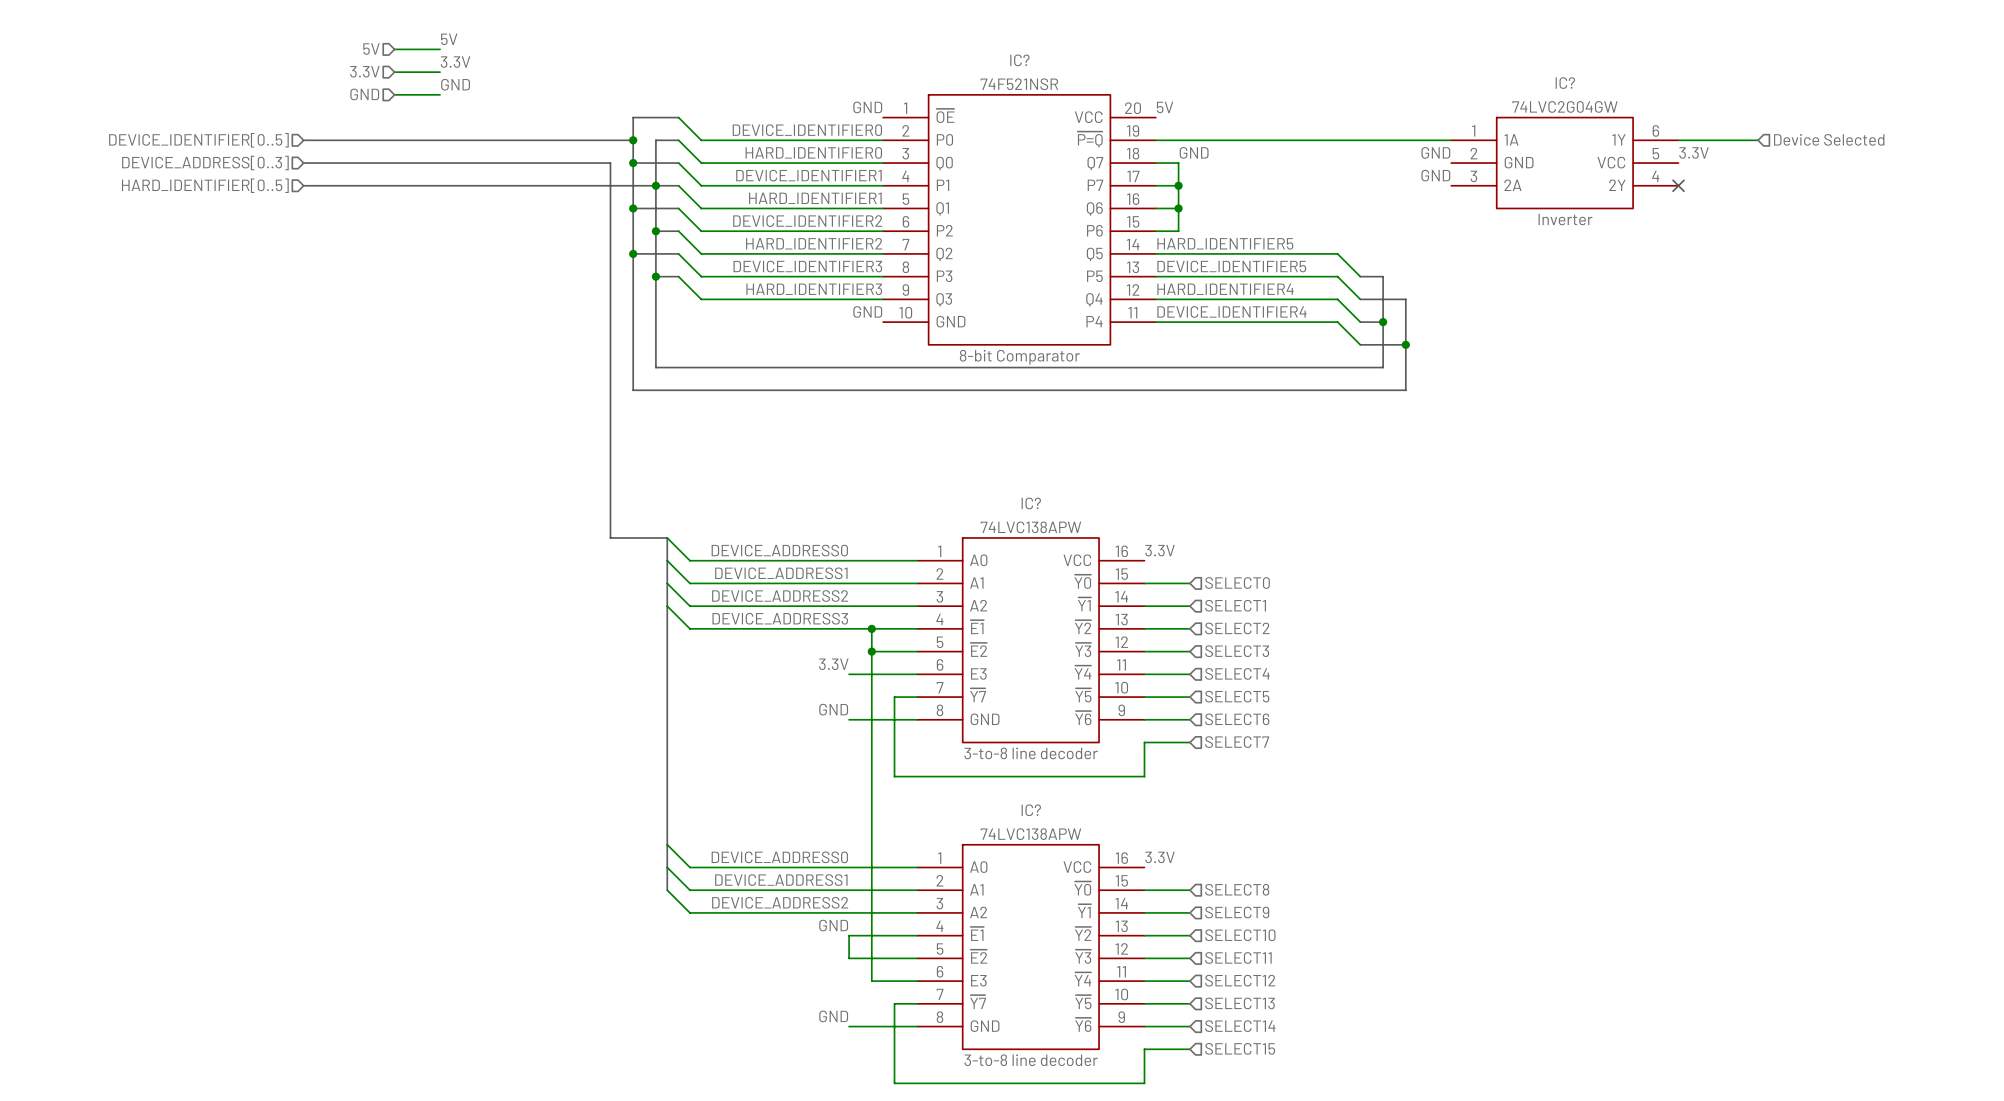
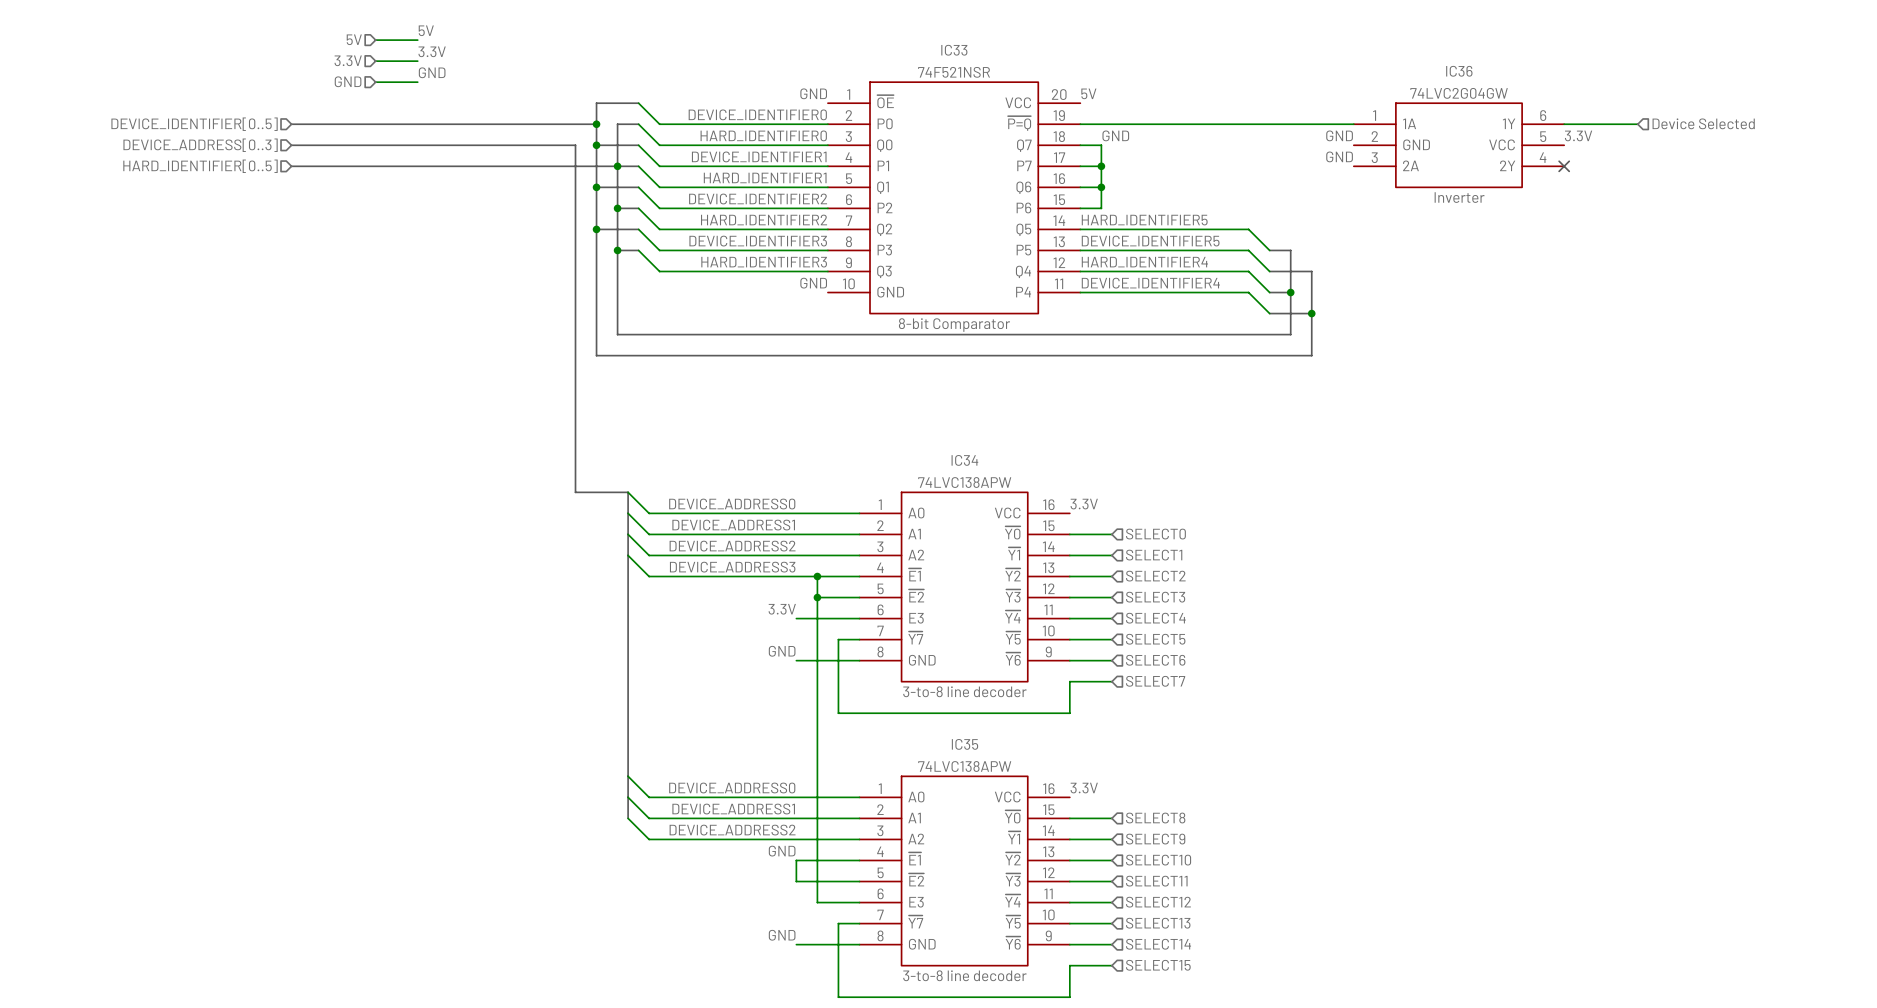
IC? name: IC? (1019, 60) -> IC33 (954, 50)
IC? name: IC? (1565, 83) -> IC36 (1459, 71)
IC? name: IC? (1031, 503) -> IC34 (964, 460)
IC? name: IC? (1031, 810) -> IC35 (964, 744)

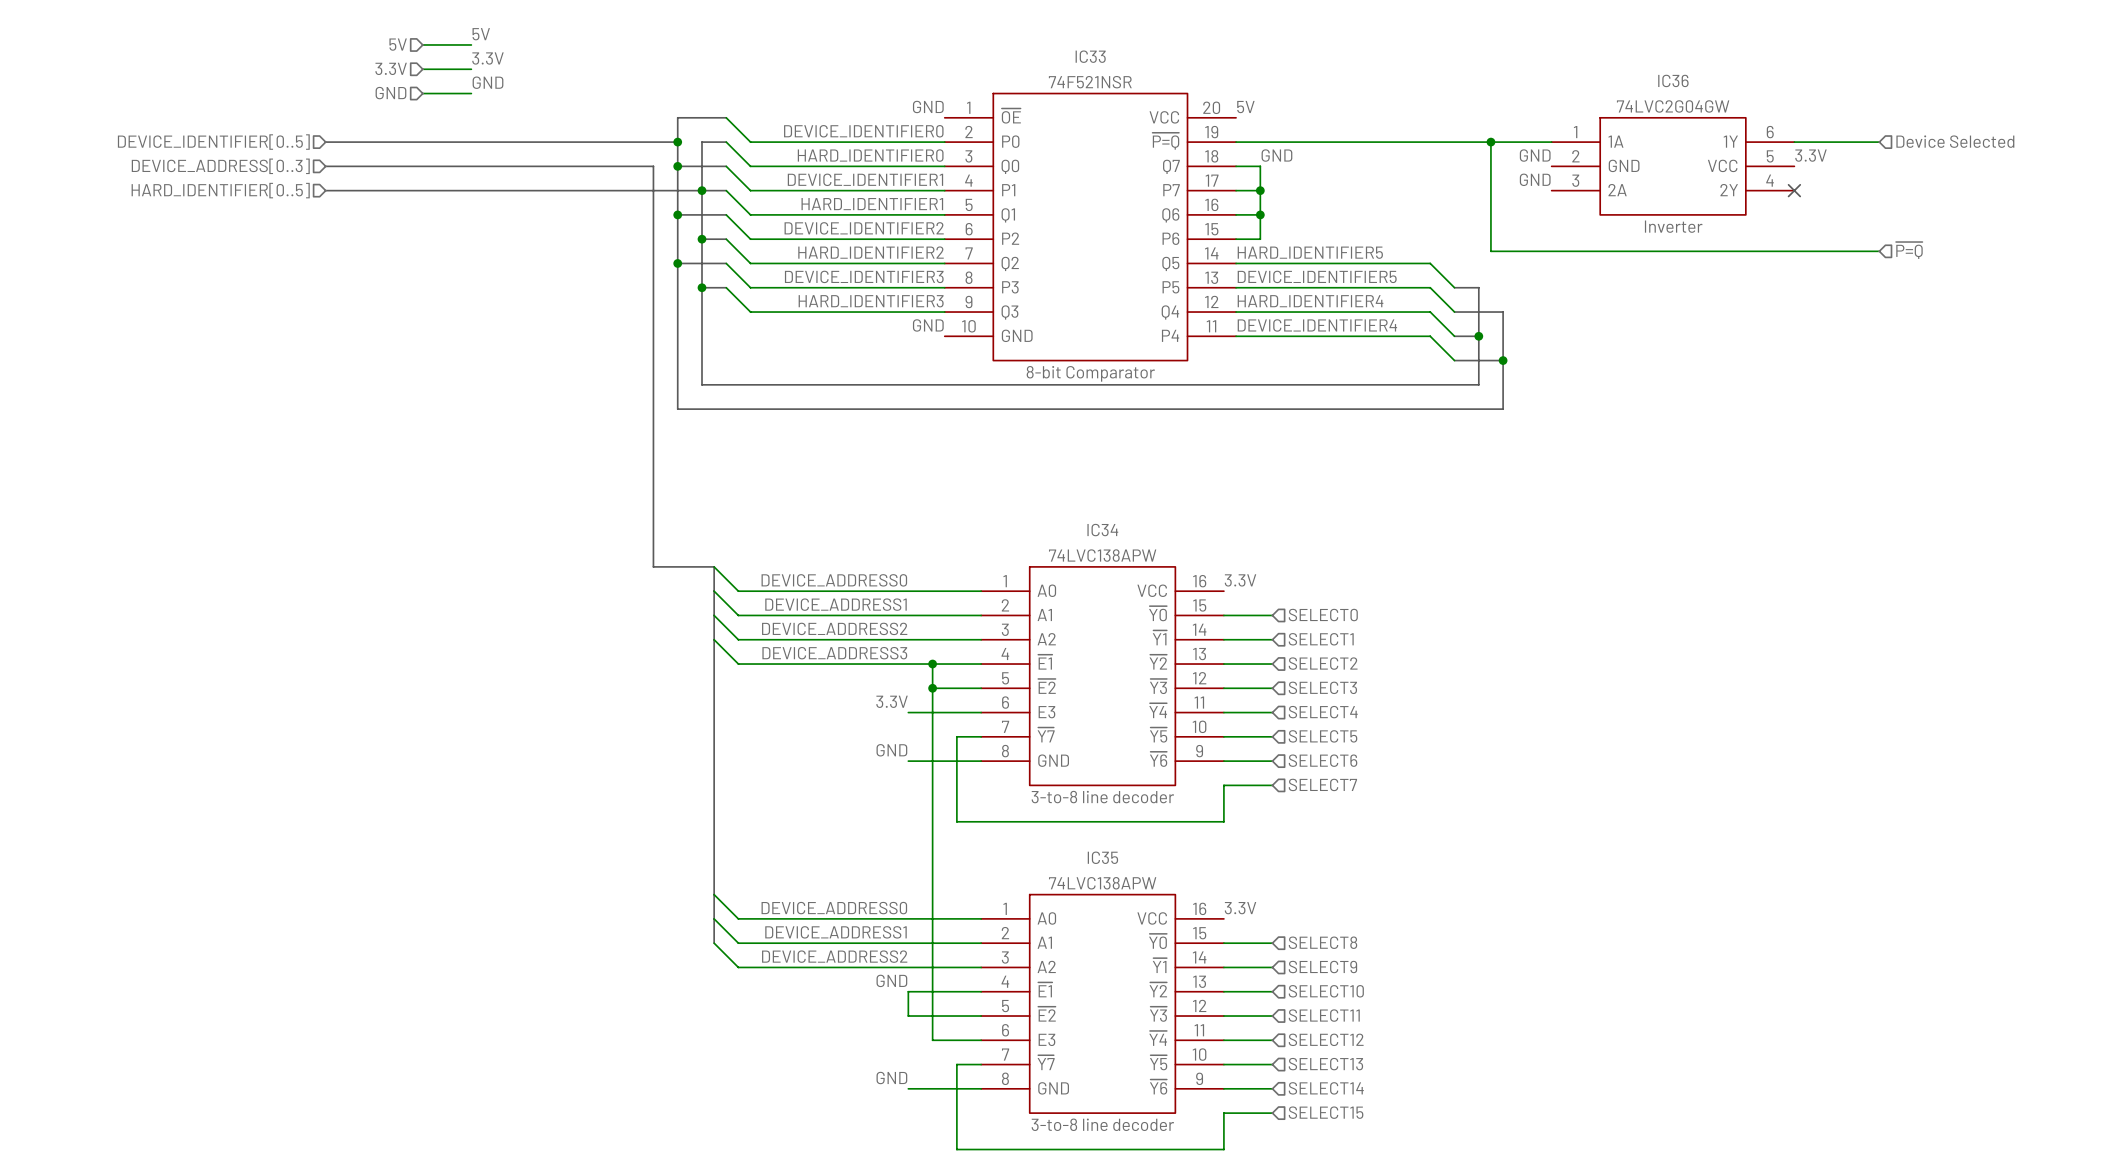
wire: none -> (1490, 142) (1490, 251) (1879, 251)
junction: none -> (1490, 142)
hierarchical label: none -> ~{P=Q} (1909, 250)

